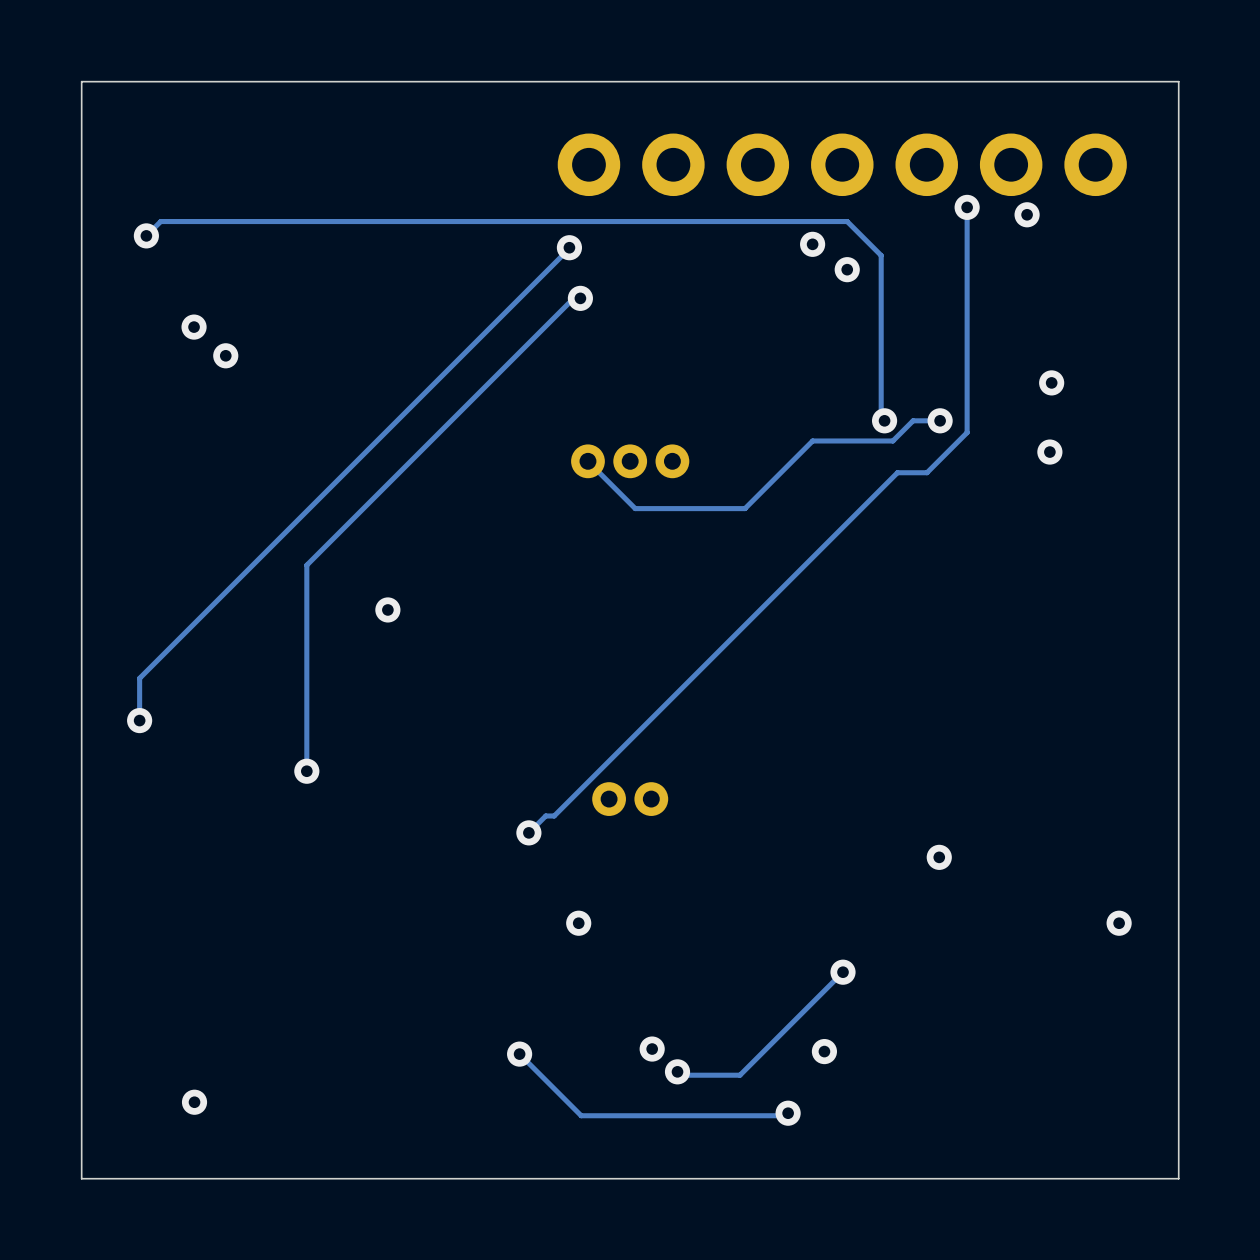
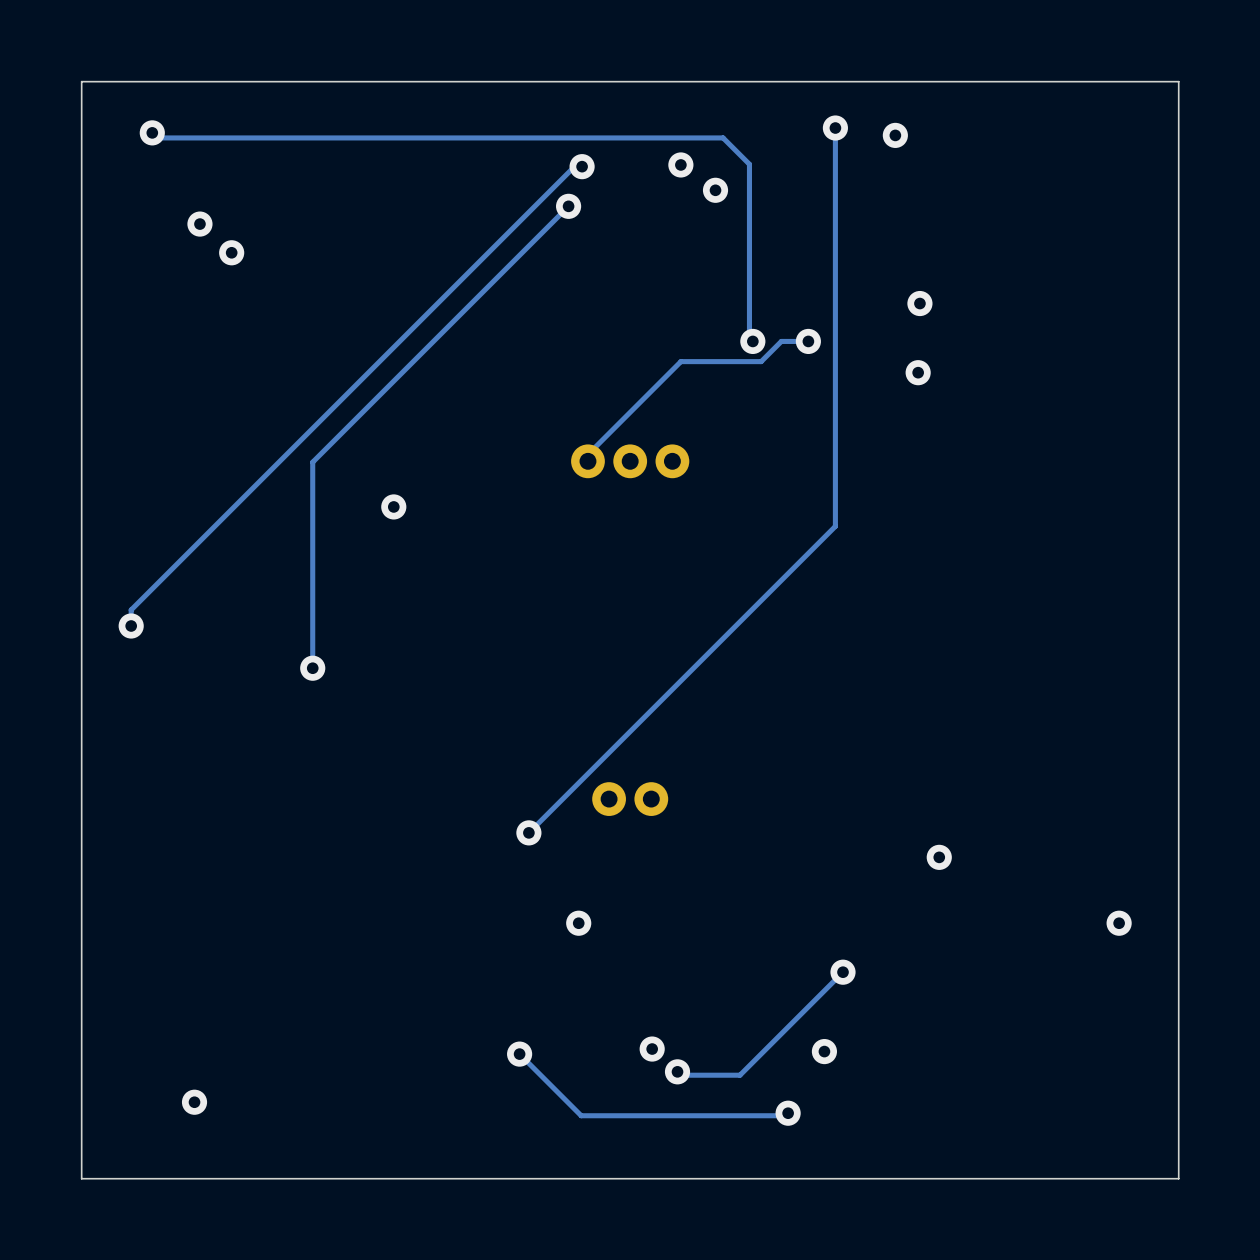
via: none -> (835, 128)
track: none -> (152, 132) (157, 137) (723, 137) (749, 164) (749, 338) (752, 341)
via: none -> (152, 132)
via: none -> (895, 135)
via: none -> (680, 164)
part: (842, 164) -> none
track: none -> (582, 166) (578, 162) (131, 609) (131, 626)
via: none -> (582, 166)
via: none -> (715, 190)
track: none -> (568, 206) (312, 462) (312, 668)
via: none -> (568, 206)
track: (967, 207) (967, 432) (927, 472) (897, 472) (554, 815) (545, 815) -> (835, 128) (835, 526) (545, 815)
via: (967, 207) -> none
via: (1027, 214) -> none
via: none -> (199, 224)
track: (146, 235) (160, 221) (847, 221) (881, 255) (881, 417) (884, 420) -> none
via: (146, 235) -> none
via: (812, 244) -> none
track: (569, 247) (139, 678) (139, 720) -> none
via: (569, 247) -> none
via: none -> (231, 252)
via: (847, 269) -> none
track: (580, 298) (573, 298) (306, 565) (306, 771) -> none
via: (580, 298) -> none
via: none -> (919, 303)
via: (194, 327) -> none
via: none -> (752, 341)
via: none -> (808, 341)
via: (225, 355) -> none
via: none -> (918, 372)
via: (1051, 382) -> none
via: (884, 420) -> none
track: (940, 420) (913, 420) (892, 440) (812, 440) (745, 508) (635, 508) (587, 461) -> (808, 341) (781, 341) (761, 361) (680, 361) (587, 454) (587, 461)
via: (940, 420) -> none
via: (1049, 452) -> none
via: none -> (393, 506)
via: (387, 609) -> none
via: none -> (131, 626)
via: none -> (312, 668)
via: (139, 720) -> none
via: (306, 771) -> none

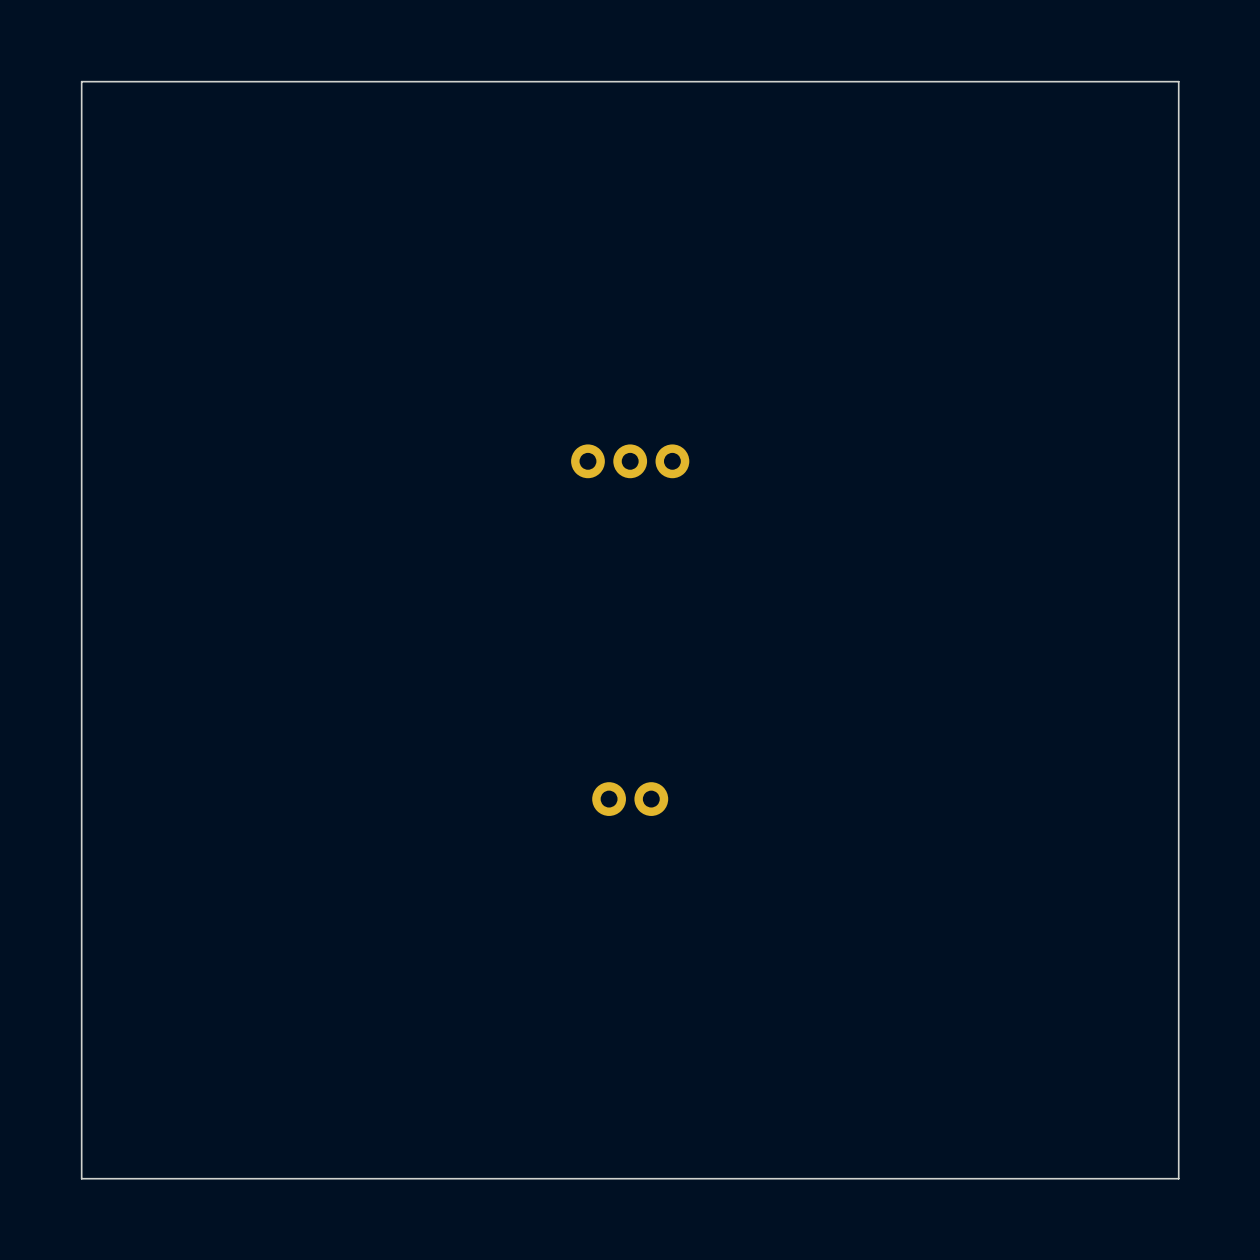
track: (835, 128) (835, 526) (528, 832) -> none
via: (835, 128) -> none
track: (152, 132) (157, 137) (723, 137) (749, 164) (749, 338) (752, 341) -> none
via: (152, 132) -> none
via: (895, 135) -> none
via: (680, 164) -> none
track: (582, 166) (578, 162) (131, 609) (131, 626) -> none
via: (582, 166) -> none
via: (715, 190) -> none
track: (568, 206) (312, 462) (312, 668) -> none
via: (568, 206) -> none
via: (199, 224) -> none
via: (231, 252) -> none
via: (919, 303) -> none
via: (752, 341) -> none
track: (808, 341) (781, 341) (761, 361) (680, 361) (587, 454) (587, 461) -> none
via: (808, 341) -> none
via: (918, 372) -> none
via: (393, 506) -> none
via: (131, 626) -> none
via: (312, 668) -> none
via: (528, 832) -> none
via: (939, 857) -> none
via: (578, 923) -> none
via: (1119, 923) -> none
track: (843, 972) (739, 1075) (680, 1075) (677, 1071) -> none
via: (843, 972) -> none
via: (652, 1049) -> none
via: (824, 1051) -> none
track: (519, 1054) (581, 1115) (785, 1115) (788, 1113) -> none
via: (519, 1054) -> none
via: (677, 1071) -> none
via: (194, 1102) -> none
via: (788, 1113) -> none

